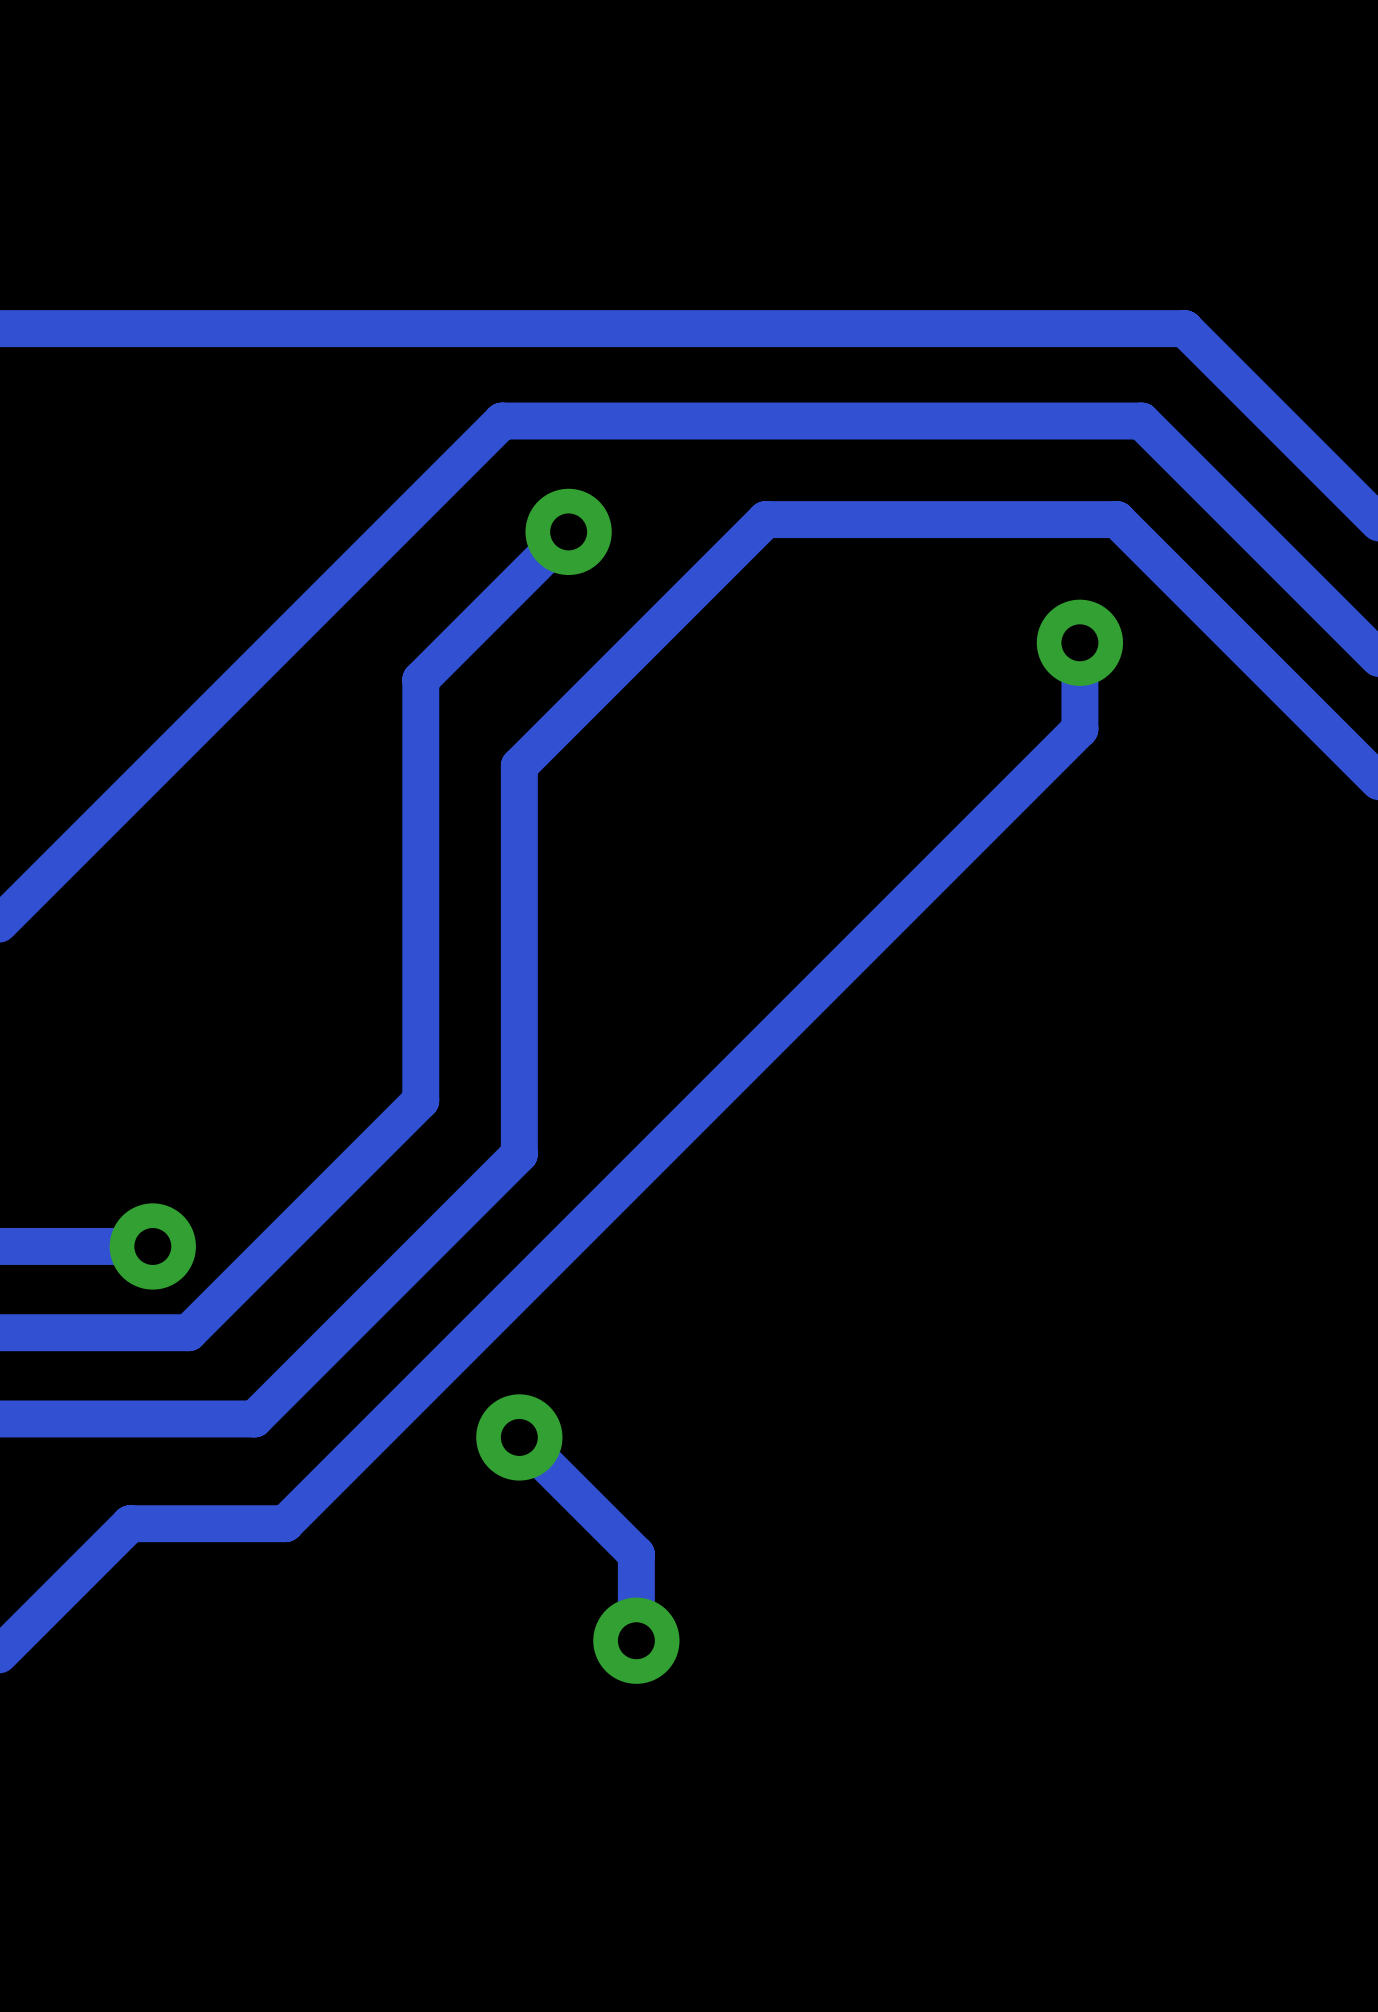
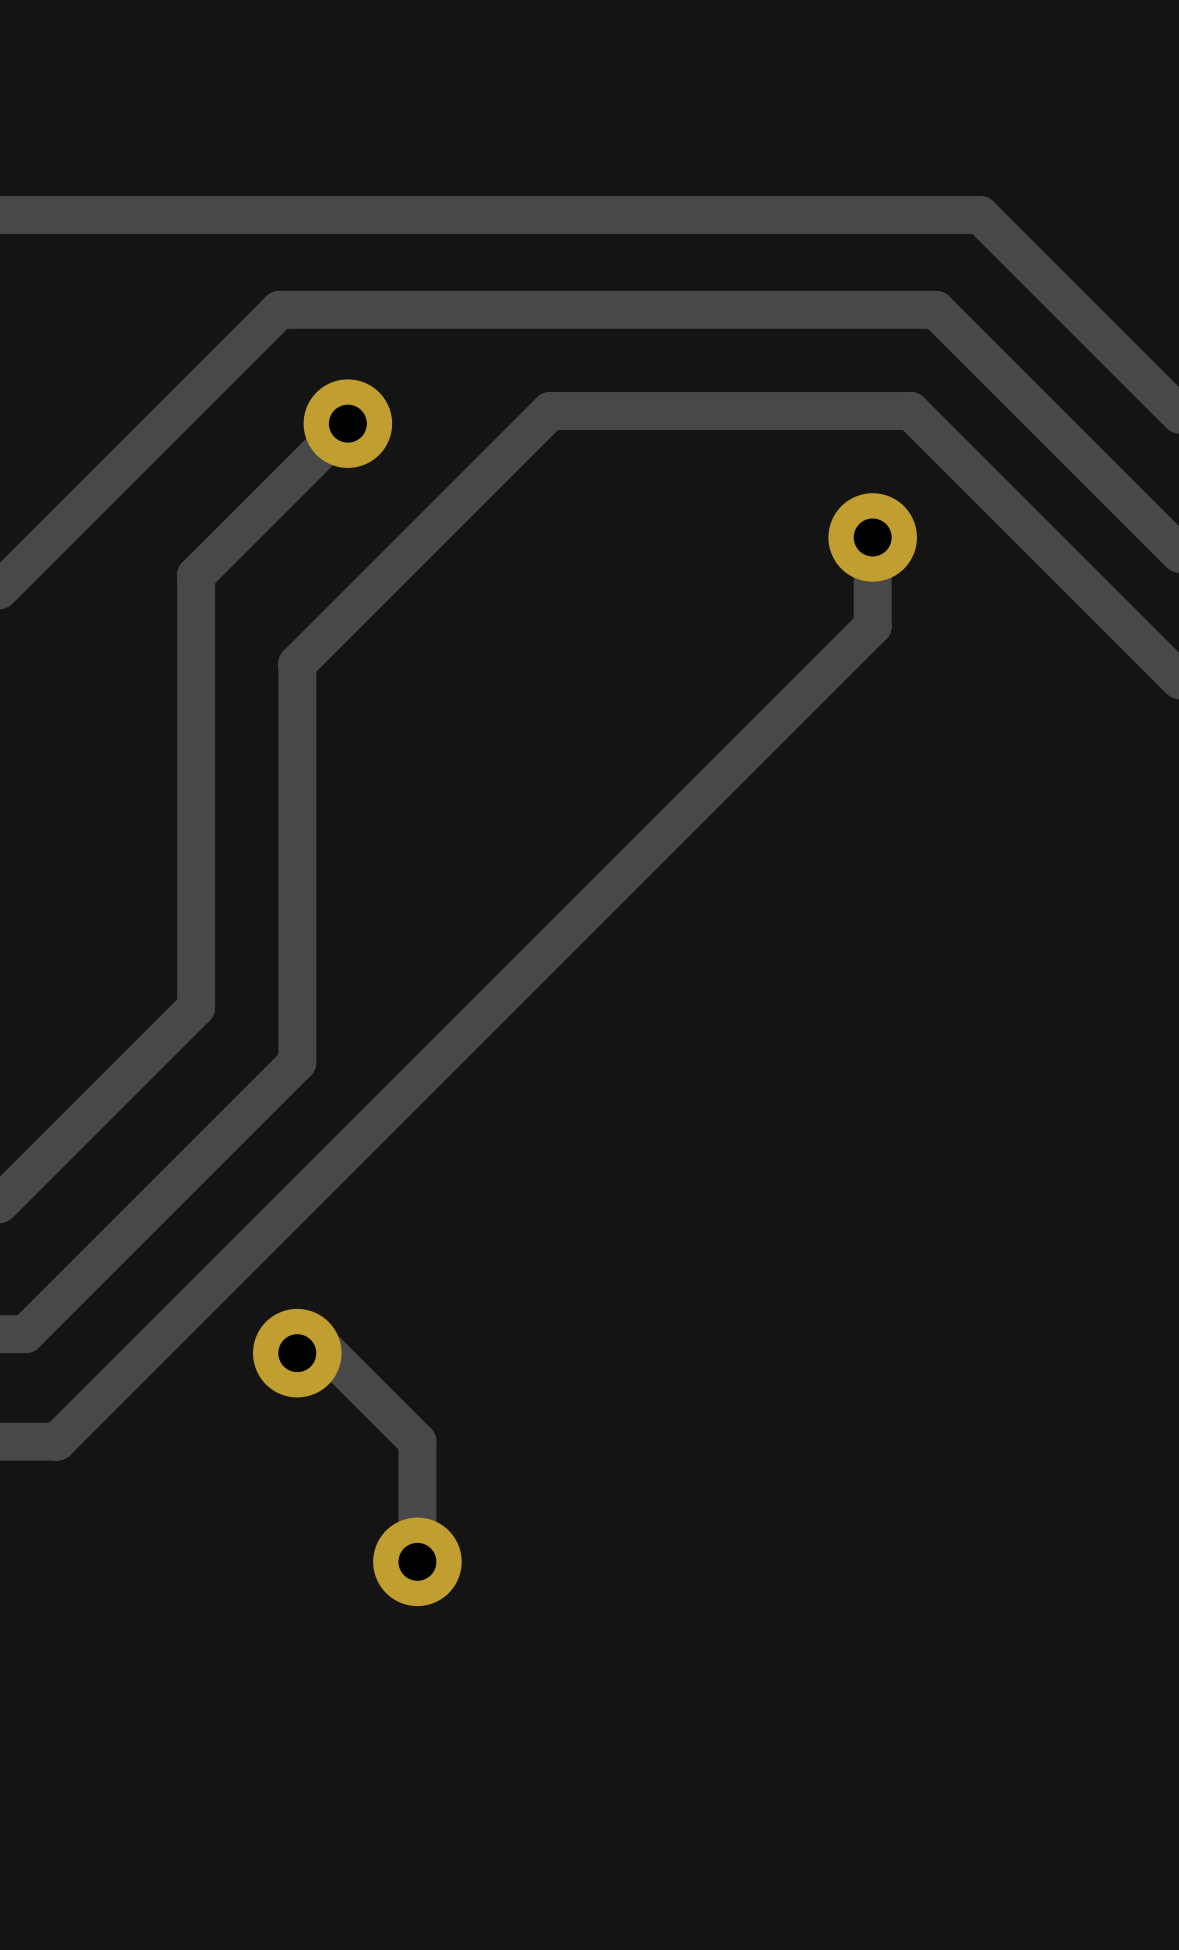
track: (519, 1437) (636, 1554) -> (297, 1353) (328, 1353) (417, 1441) (417, 1473)

